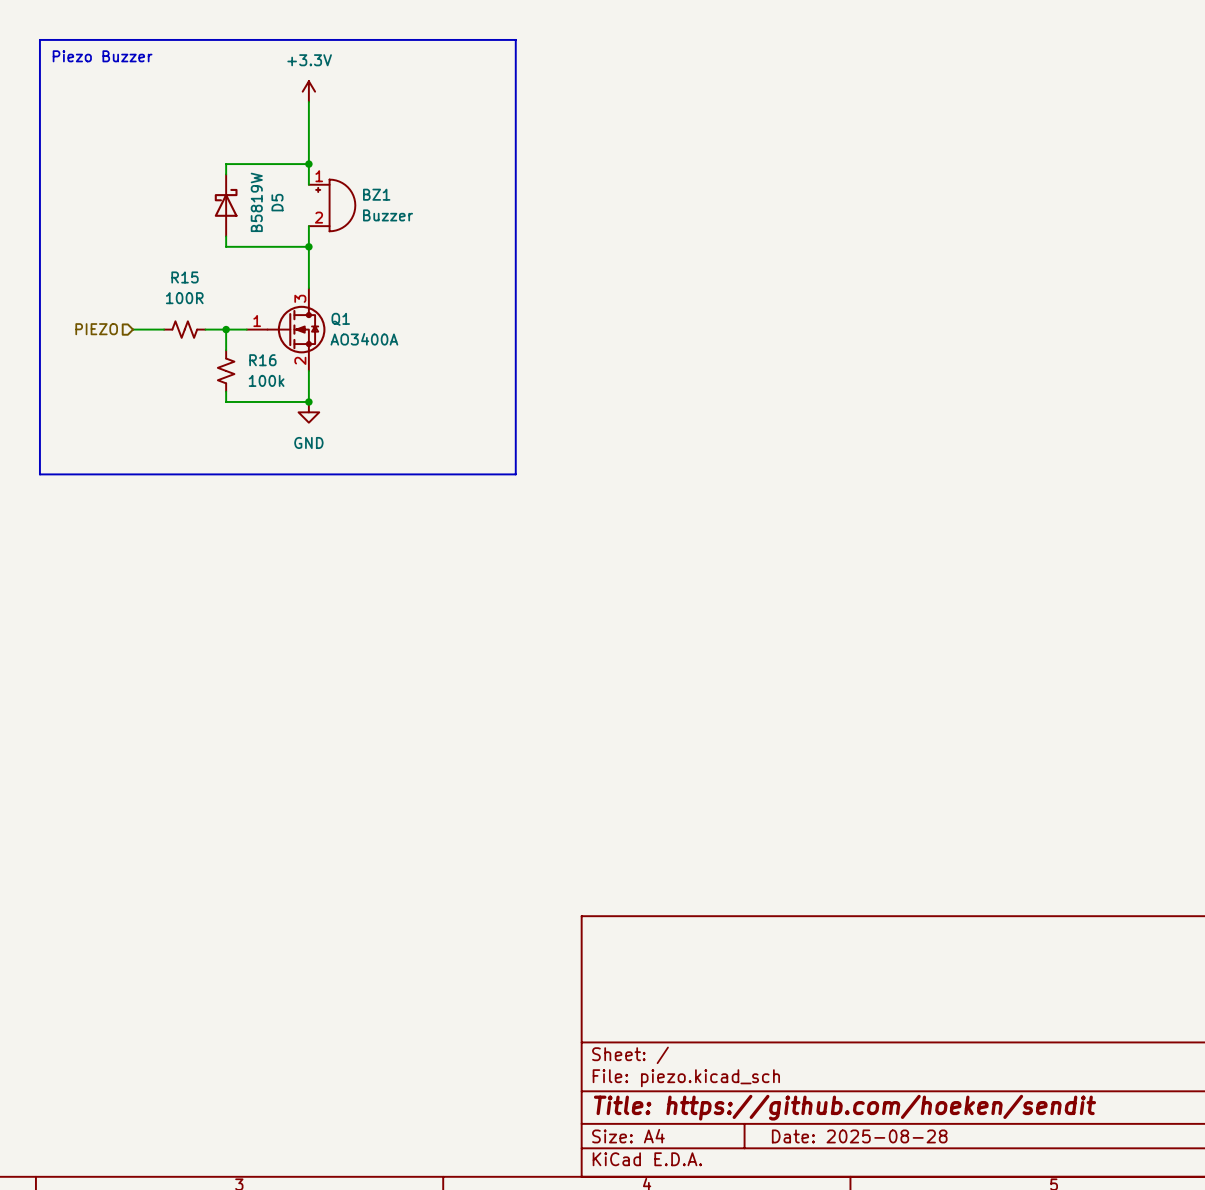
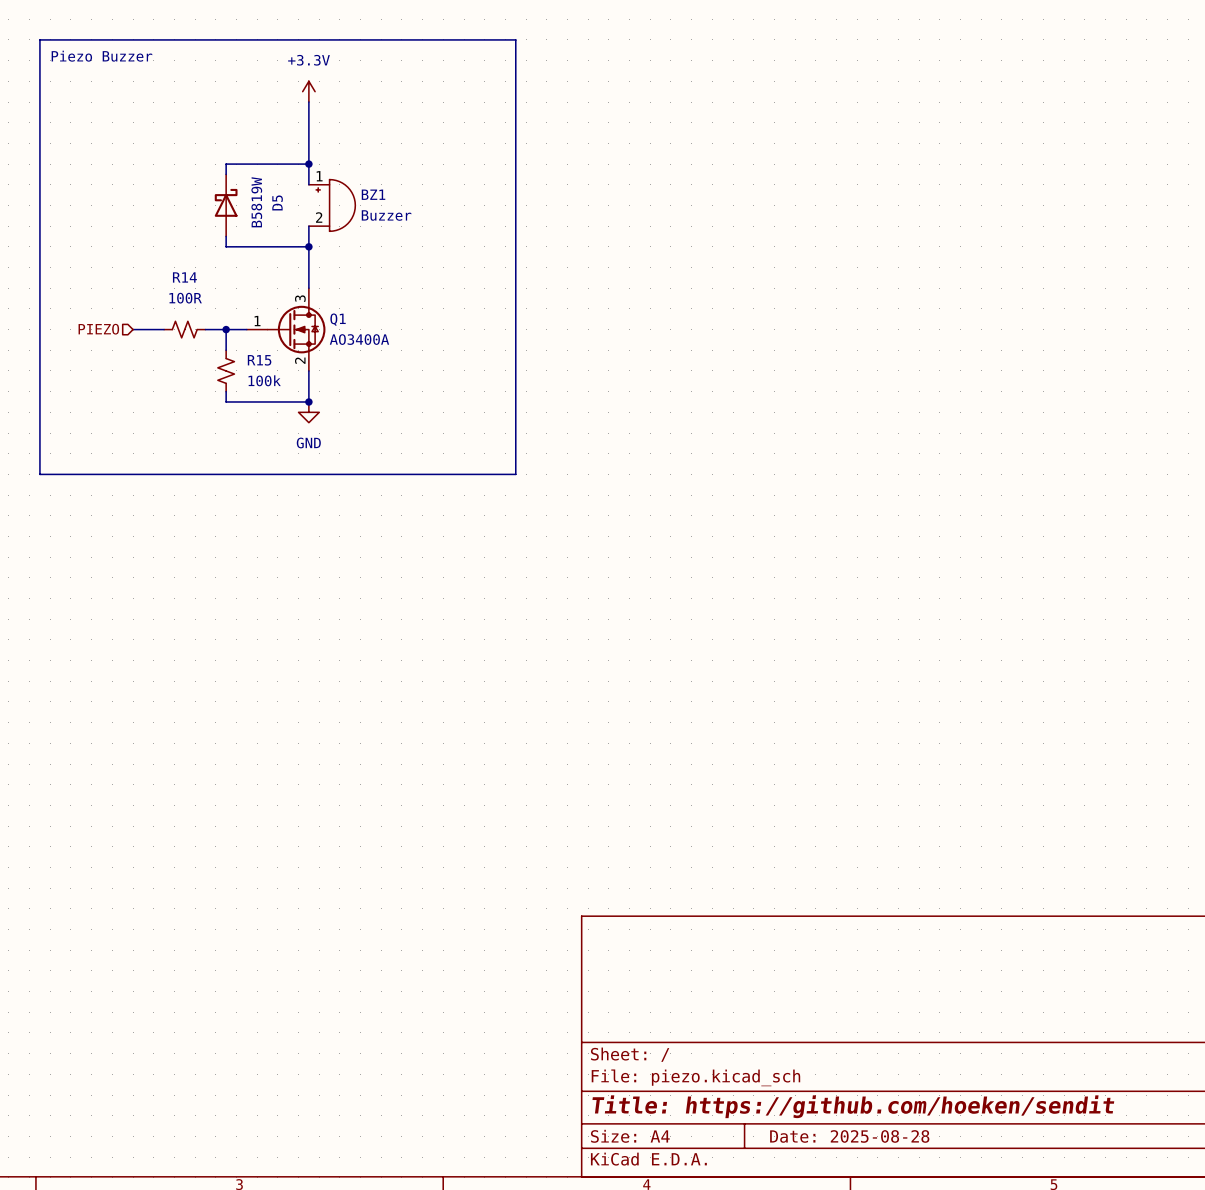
R15 name: R15 (185, 277) -> R14 (184, 277)
R16 name: R16 (262, 360) -> R15 (259, 360)

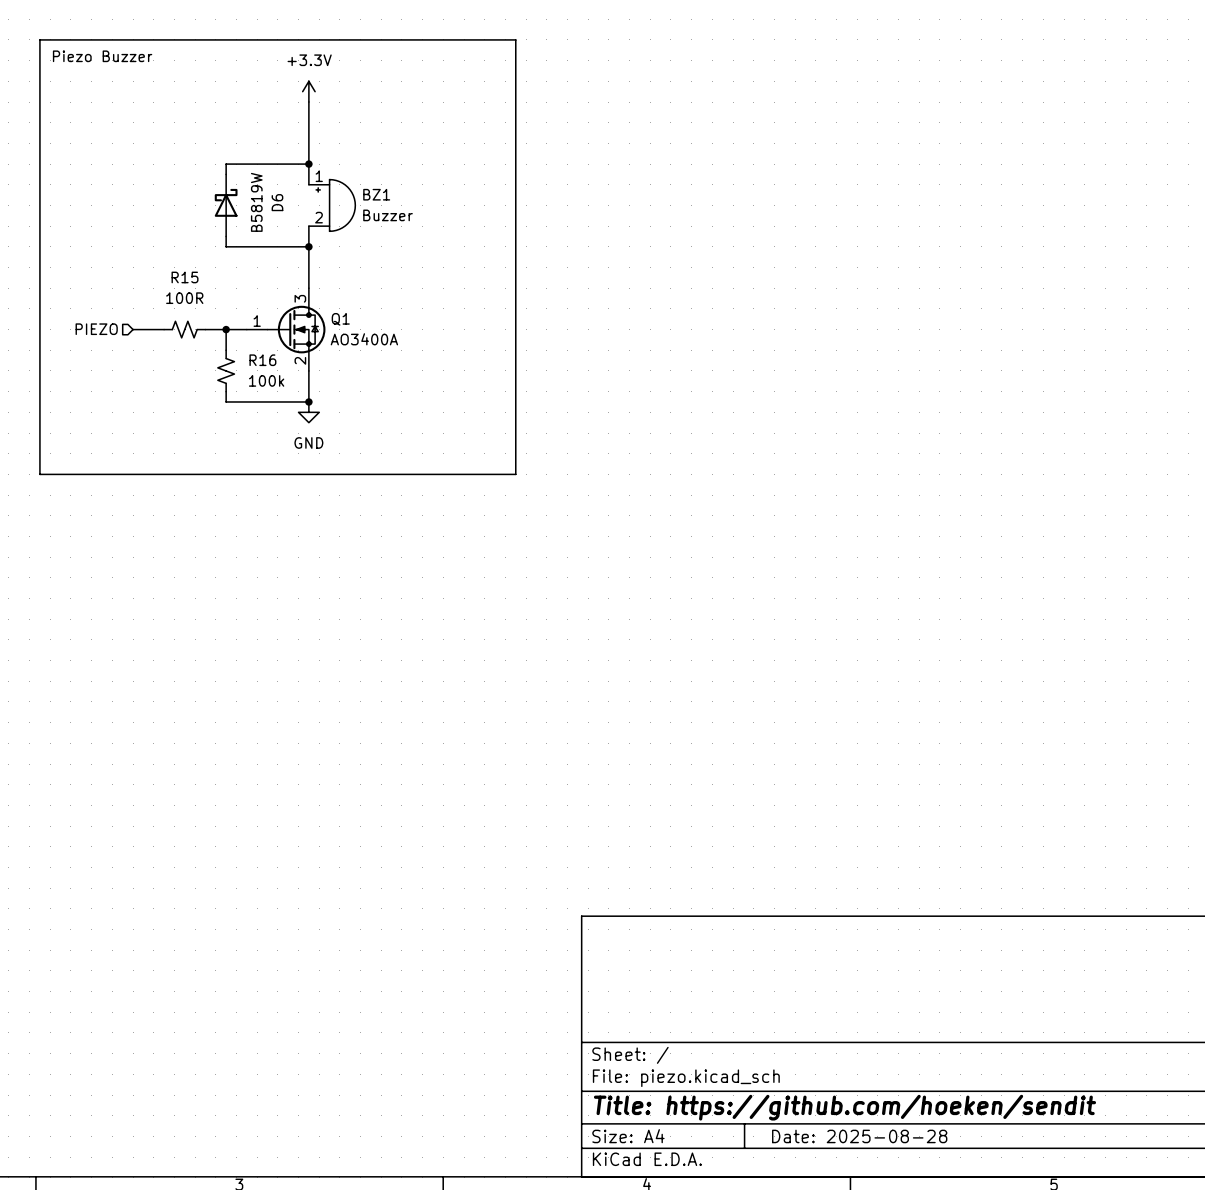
D5 name: D5 (277, 202) -> D6 (277, 202)
R14 name: R14 (184, 277) -> R15 (185, 277)
R15 name: R15 (259, 360) -> R16 (262, 360)

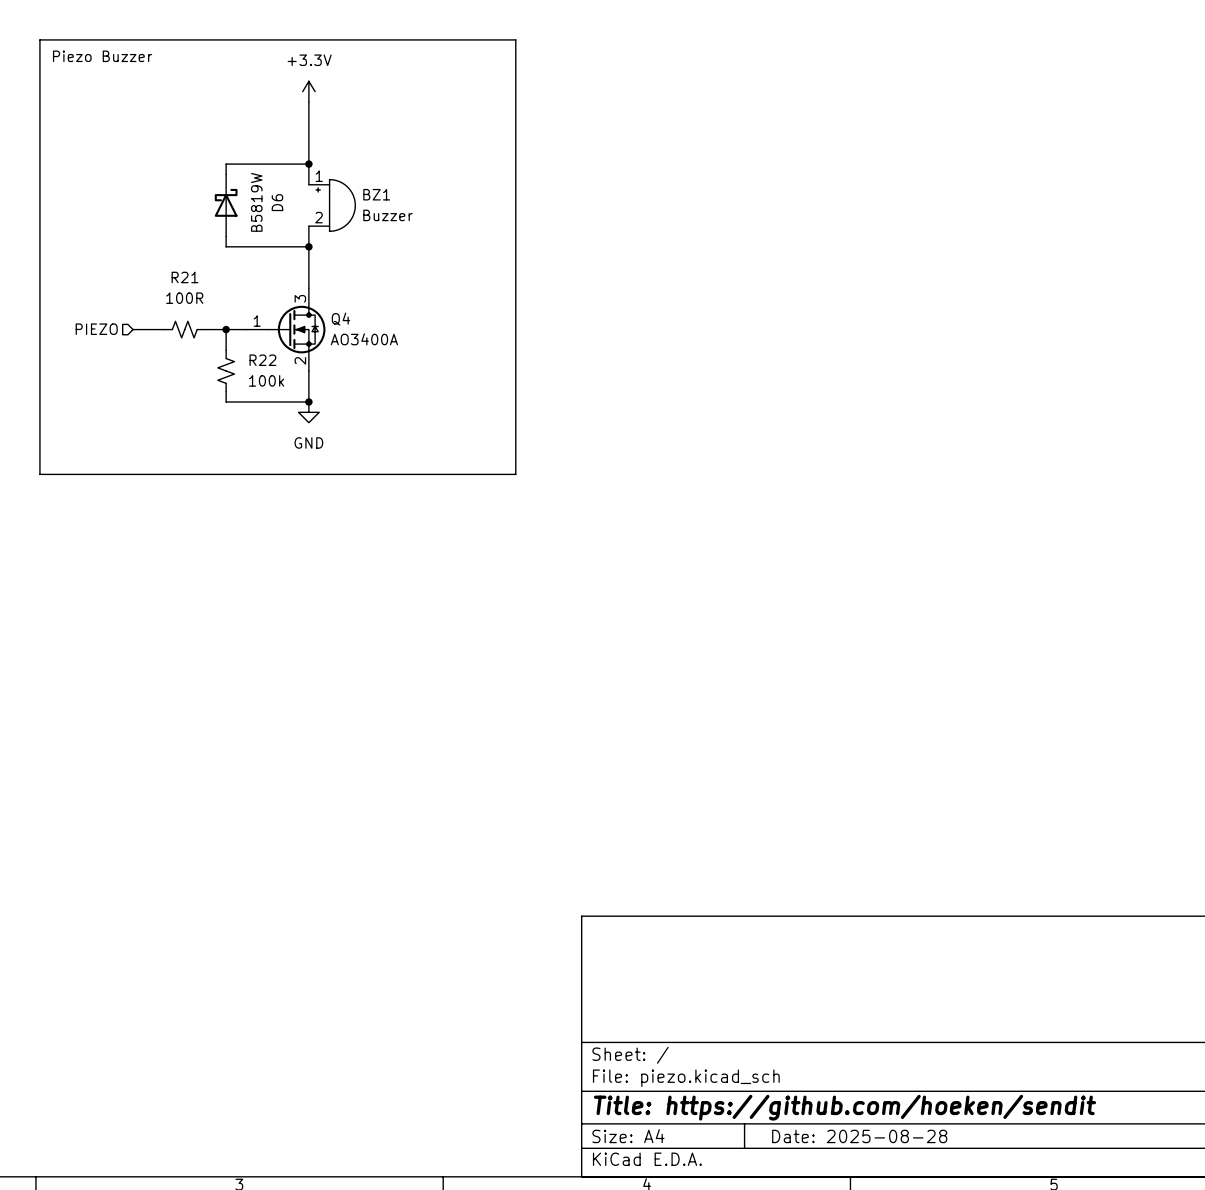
R15 name: R15 (185, 277) -> R21 (185, 277)
Q1 name: Q1 (340, 319) -> Q4 (340, 319)
R16 name: R16 (262, 360) -> R22 (262, 360)

